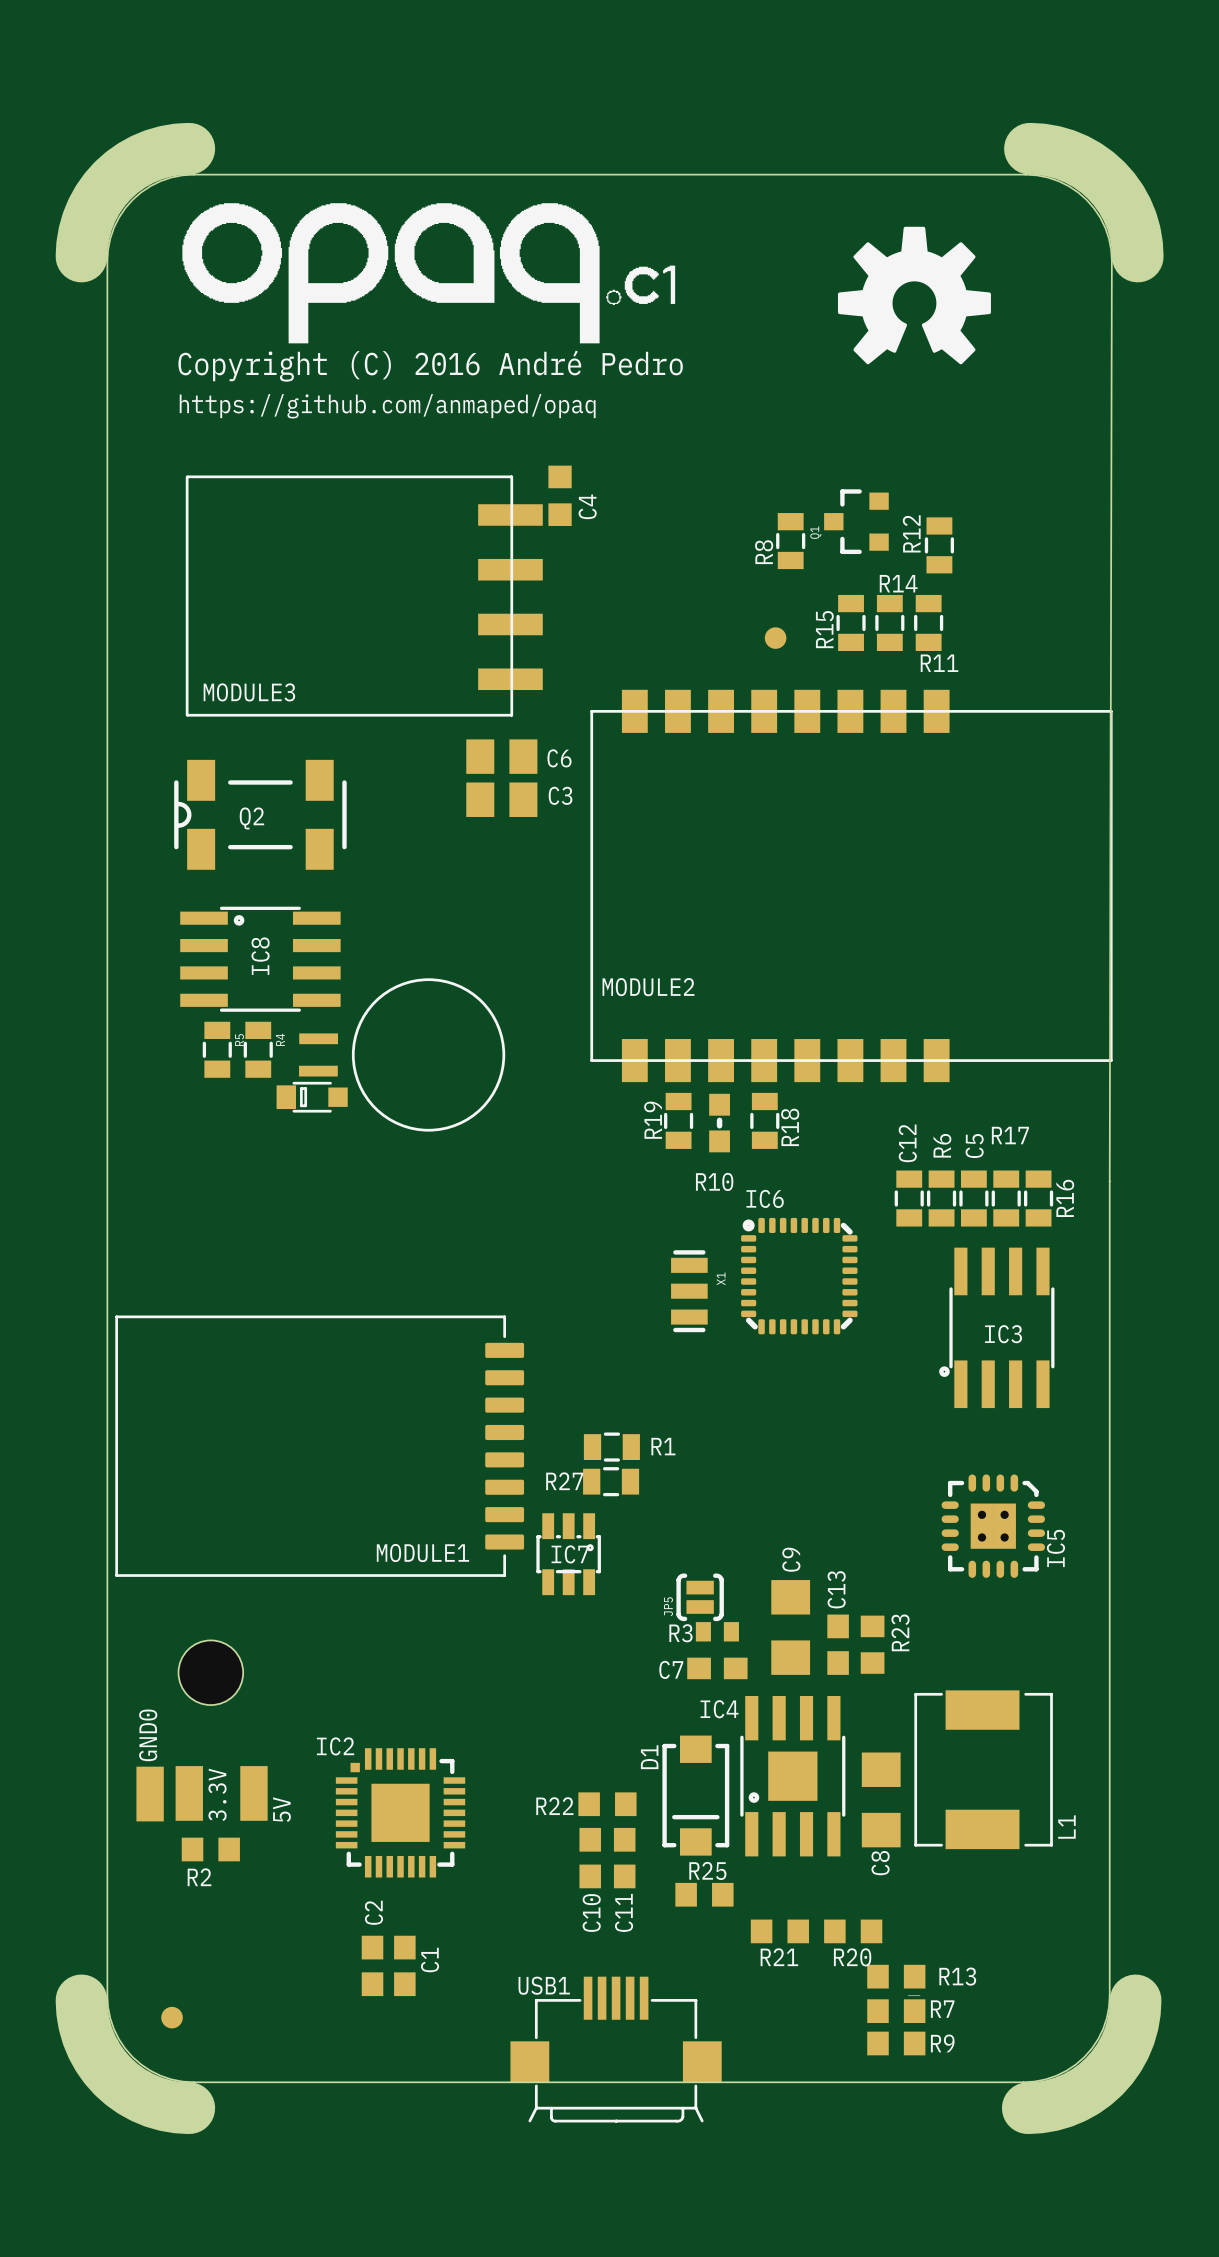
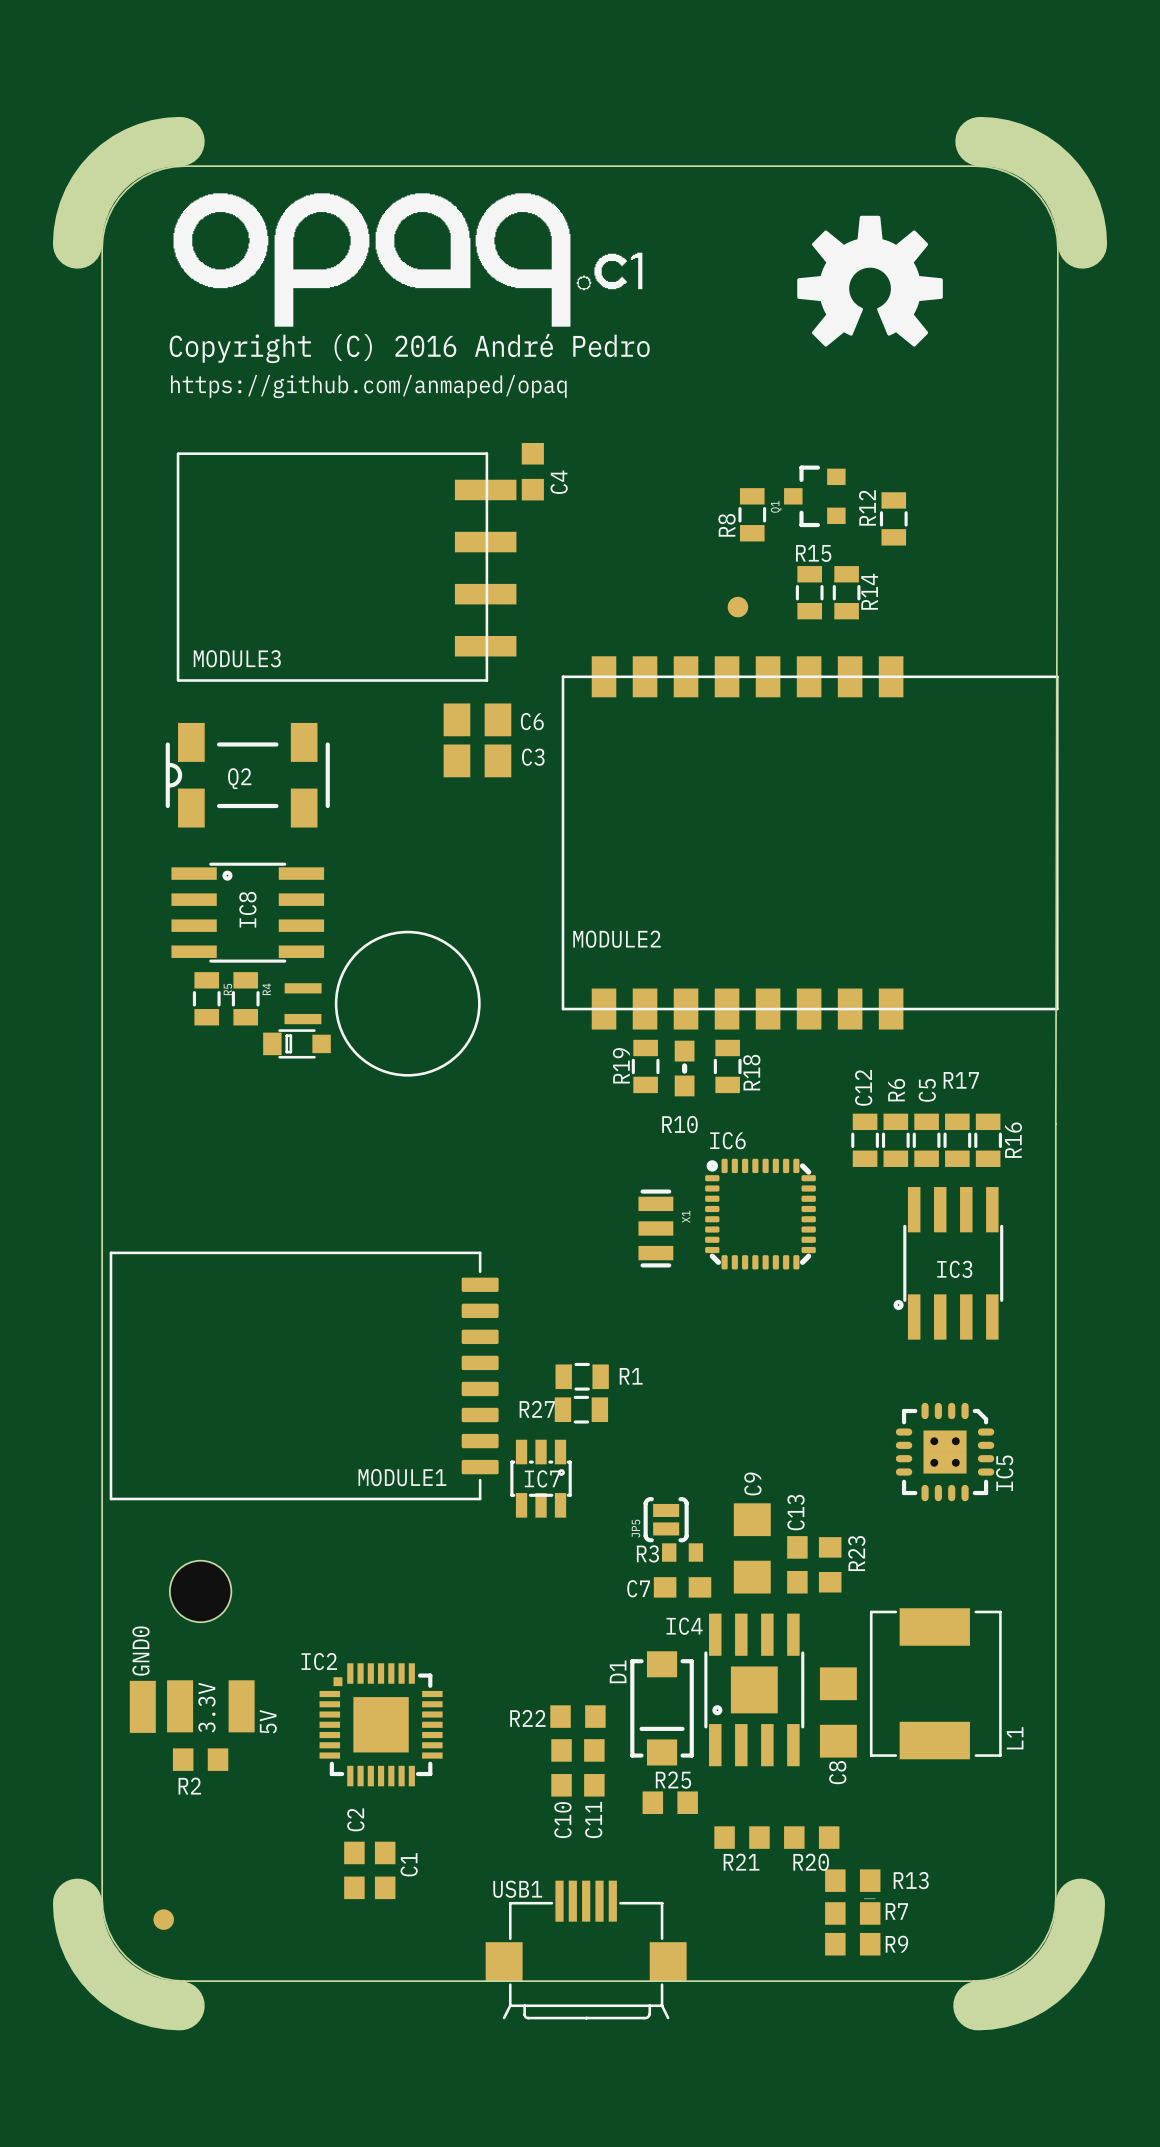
R14 name rotation: 0° (898, 583) -> 90° counterclockwise (869, 591)
R11: (928, 622) -> none
R15 name rotation: 0° (824, 629) -> 90° clockwise (813, 553)

